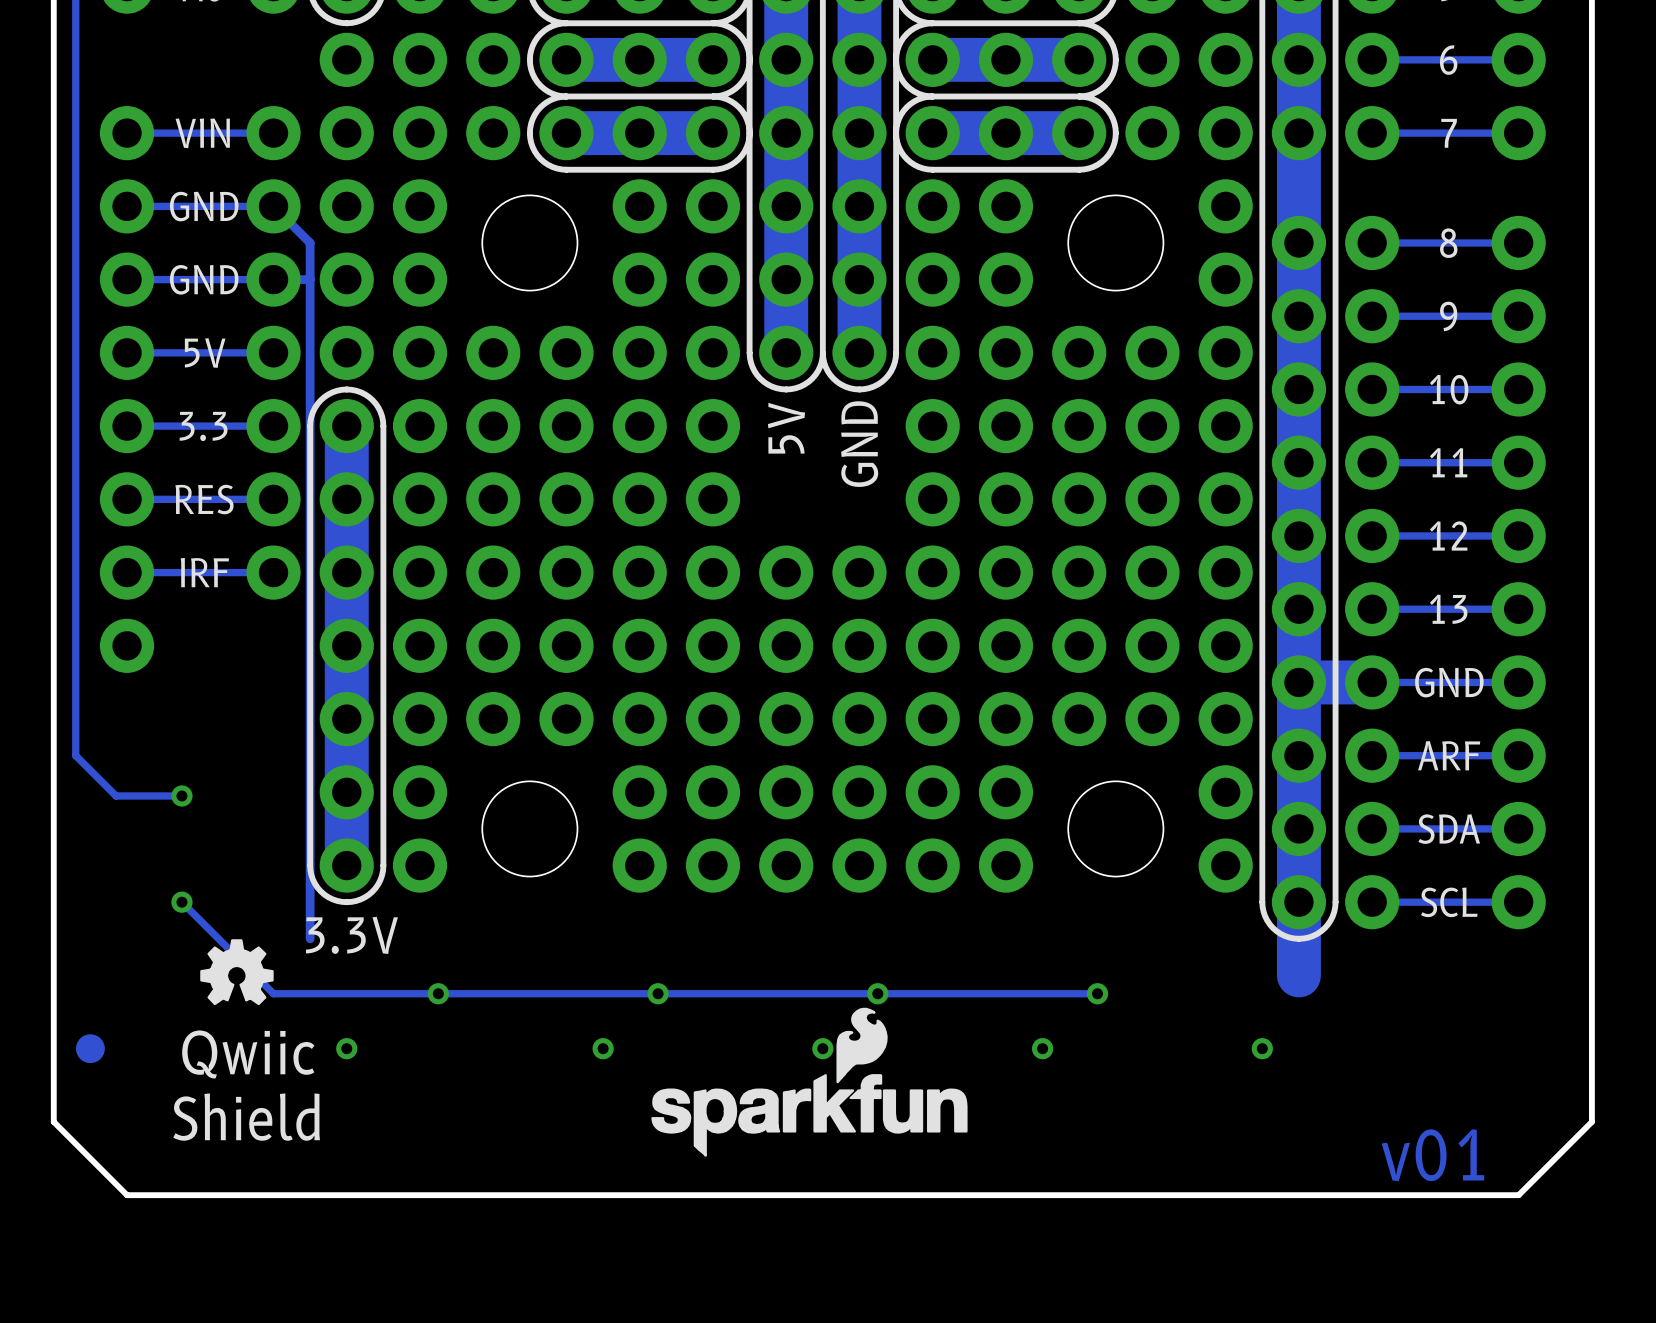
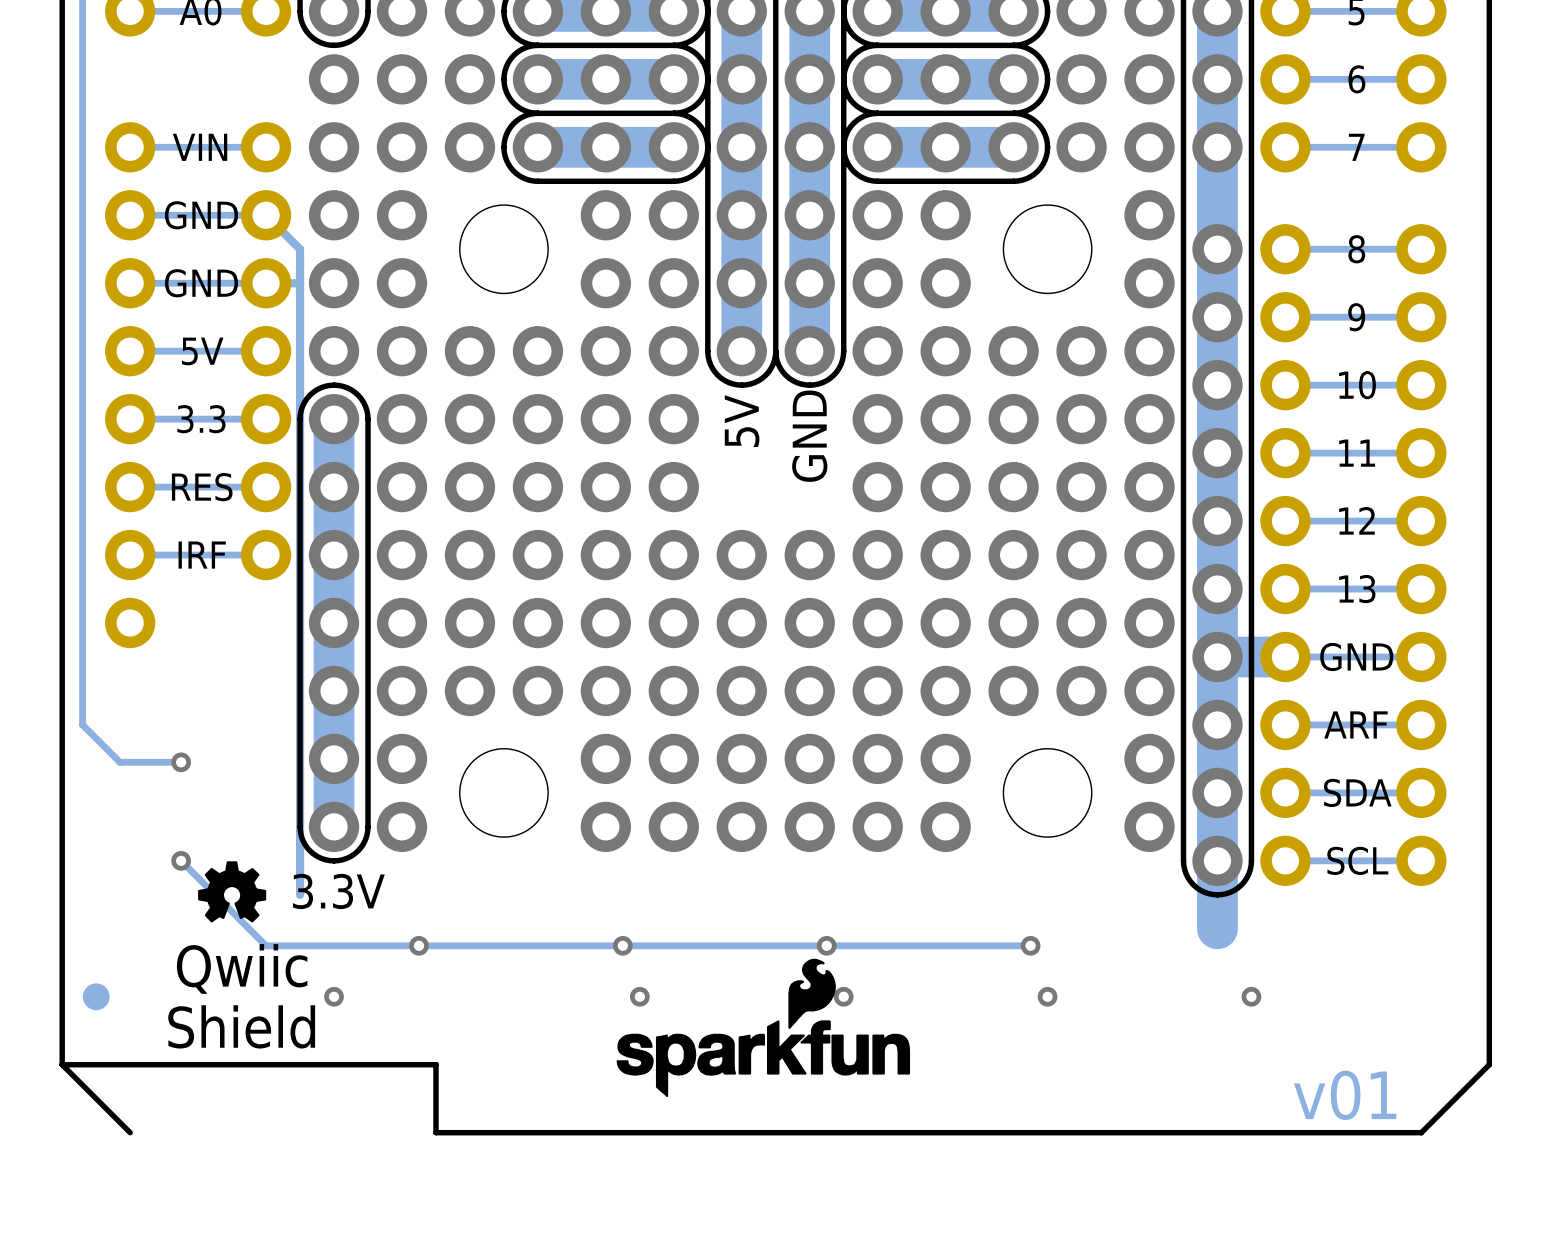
drawing position: (236, 972) -> (232, 891)
via: (603, 1048) -> none
via: none -> (639, 996)
via: (822, 1048) -> none
via: none -> (843, 996)
via: (1042, 1048) -> none
via: none -> (1047, 996)
via: (1262, 1048) -> none
via: none -> (1251, 996)
text position: Qwiic (248, 1054) -> Qwiic (242, 968)
text position: Shield (246, 1117) -> Shield (241, 1026)
board edge: (456, 1195) (127, 1195) -> (435, 1132) (435, 1064) (62, 1064)

